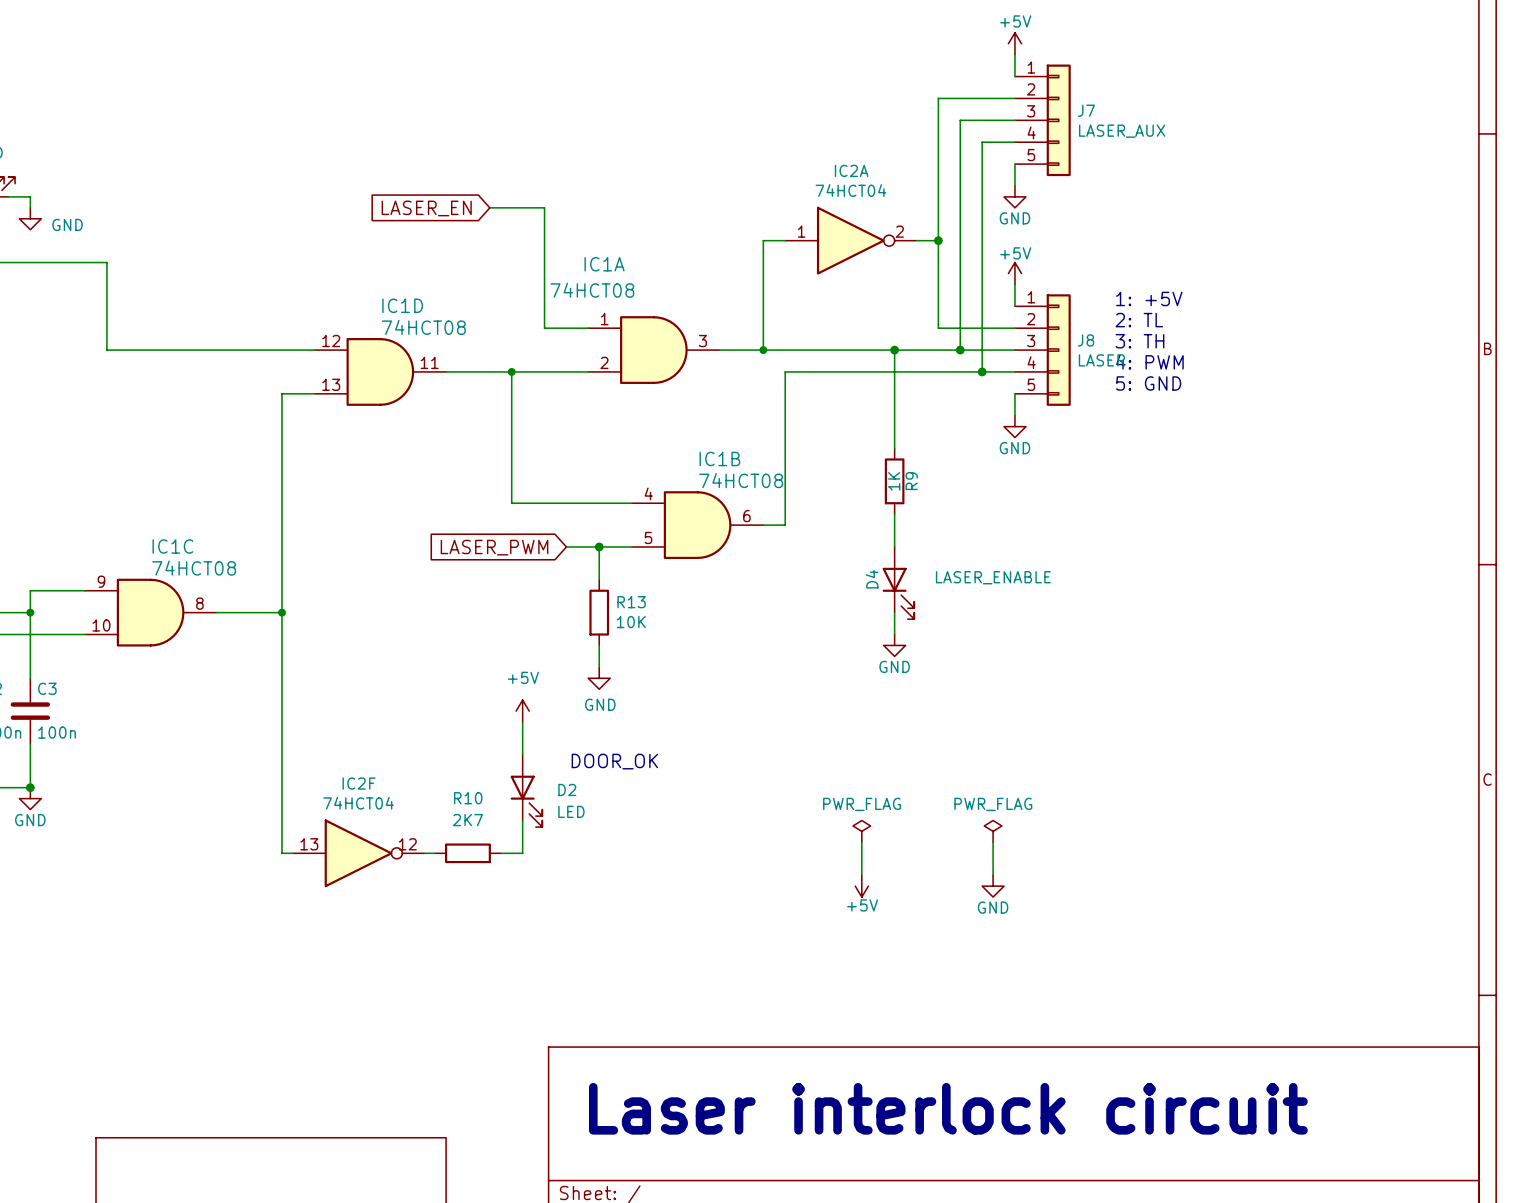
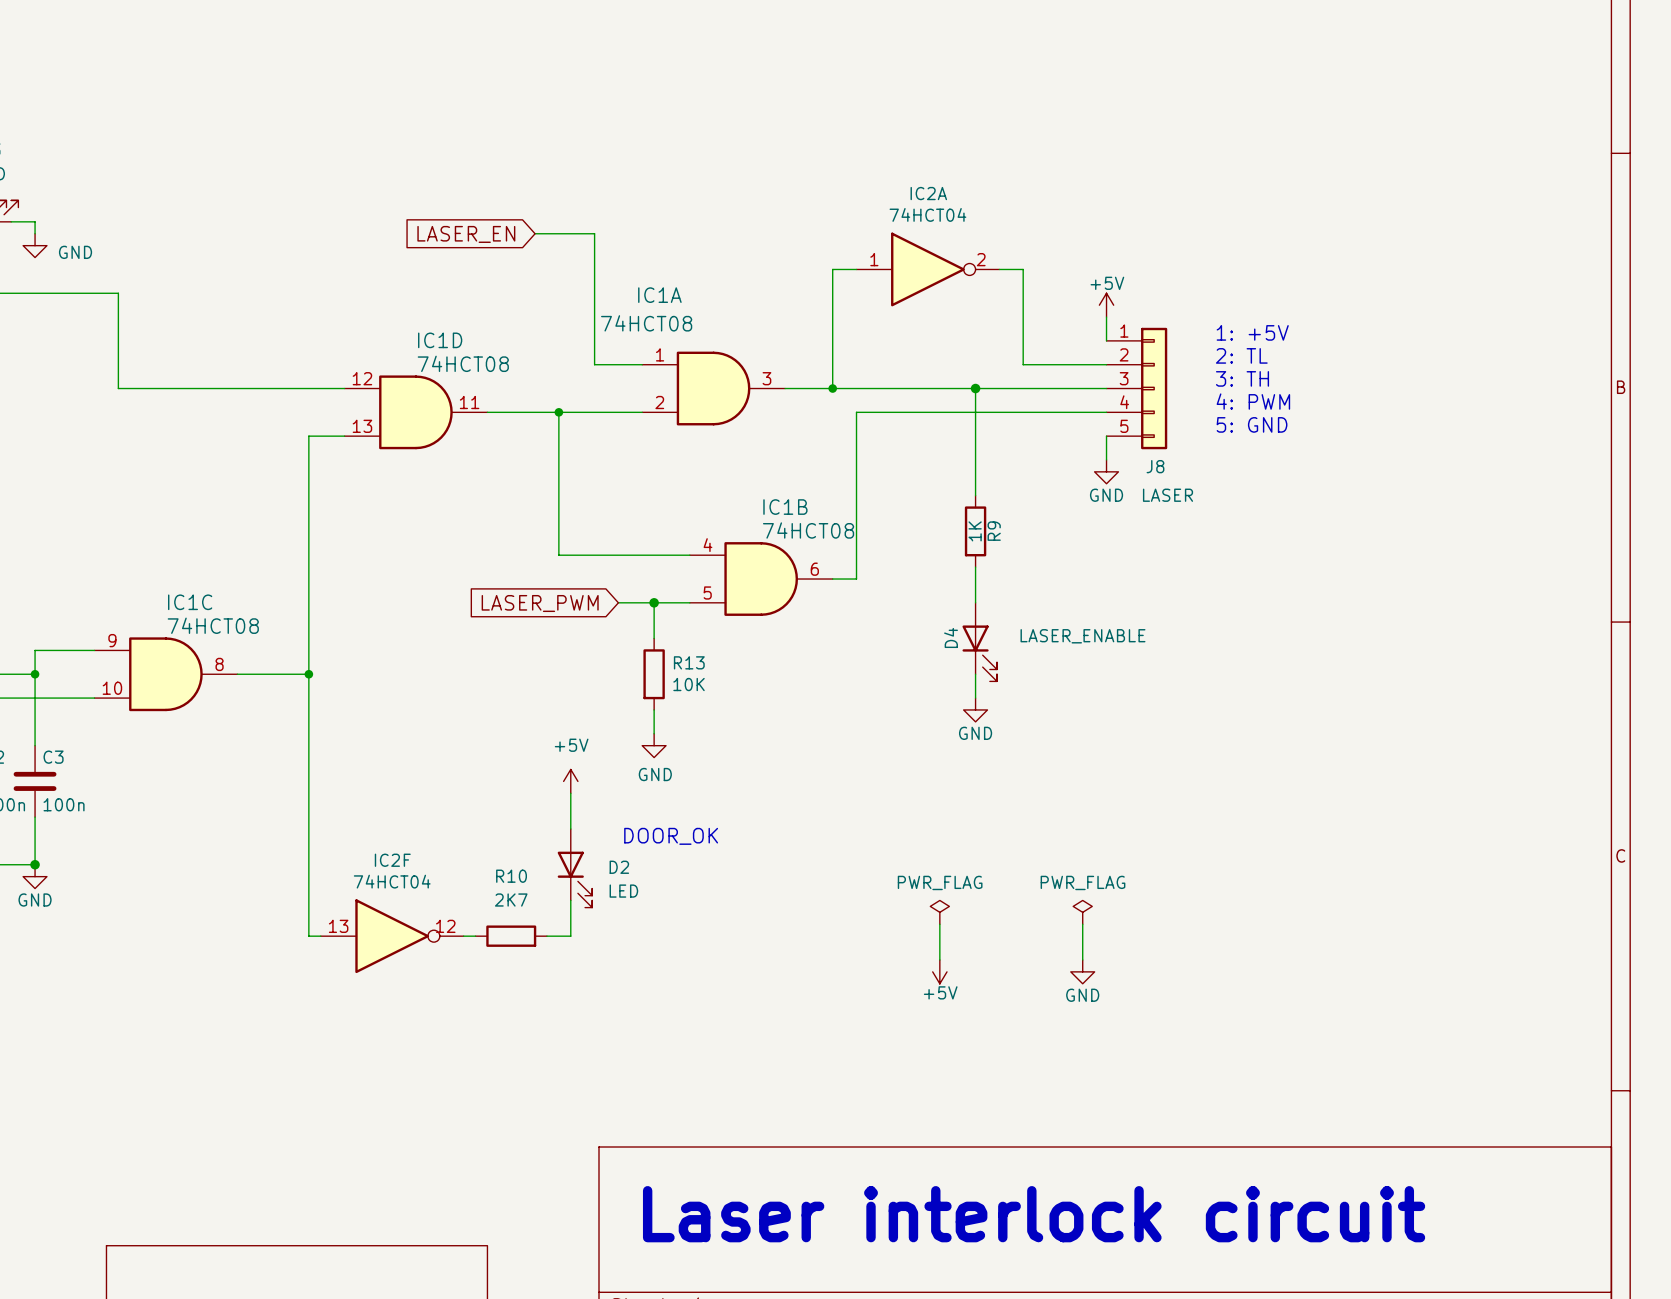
power symbol: +5V (1014, 43) -> none
wire: (1014, 54) (1014, 76) -> none
wire: (1014, 98) (938, 98) (938, 240) -> none
wire: (1014, 120) (960, 120) (960, 350) -> none
J7: LASER_AUX (1042, 120) -> none
wire: (1014, 142) (982, 142) (982, 371) -> none
wire: (1014, 164) (1014, 185) -> none
power symbol: GND (1014, 196) -> none
junction: (938, 240) -> none
J8 name position: J8 (1085, 340) -> J8 (1155, 466)
junction: (960, 350) -> none
J8 value position: LASER (1101, 360) -> LASER (1168, 495)
junction: (982, 371) -> none

